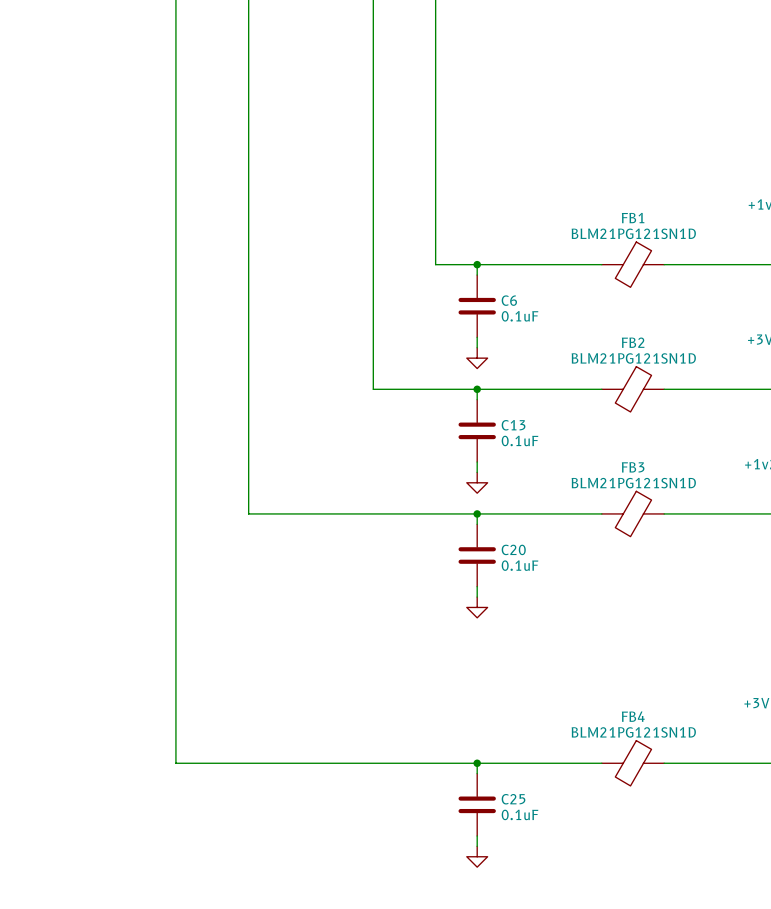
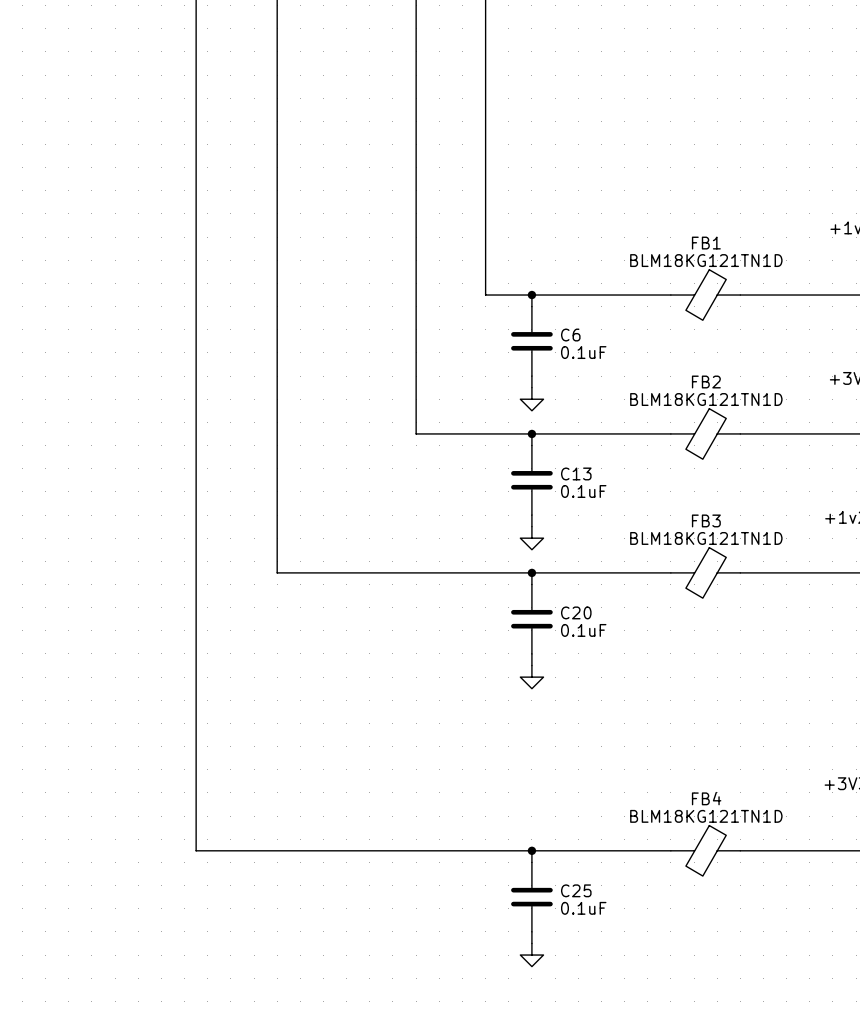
FB1 value: BLM21PG121SN1D (633, 233) -> BLM18KG121TN1D (706, 260)
FB2 value: BLM21PG121SN1D (633, 358) -> BLM18KG121TN1D (706, 399)
FB3 value: BLM21PG121SN1D (633, 483) -> BLM18KG121TN1D (706, 538)
FB4 value: BLM21PG121SN1D (633, 732) -> BLM18KG121TN1D (706, 816)

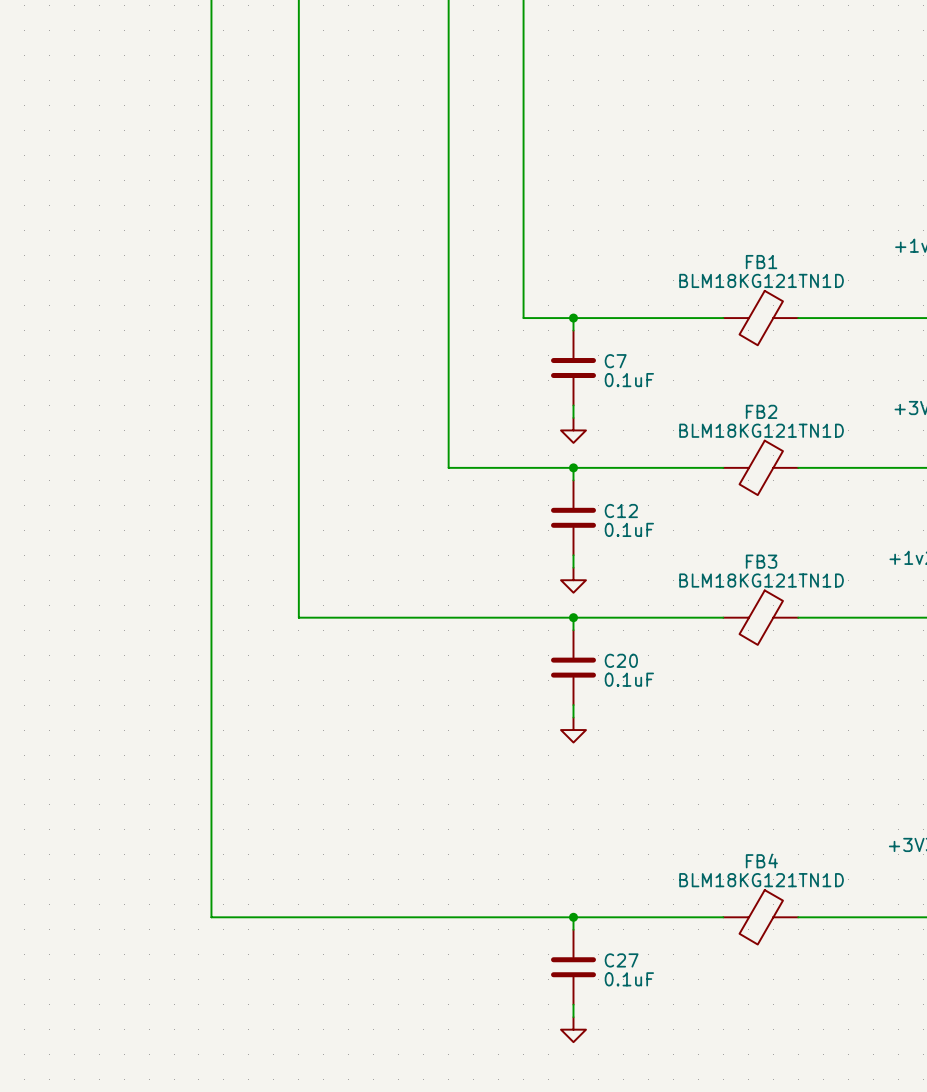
C6 name: C6 (570, 335) -> C7 (615, 361)
C13 name: C13 (576, 473) -> C12 (621, 511)
C25 name: C25 (576, 890) -> C27 (621, 960)

